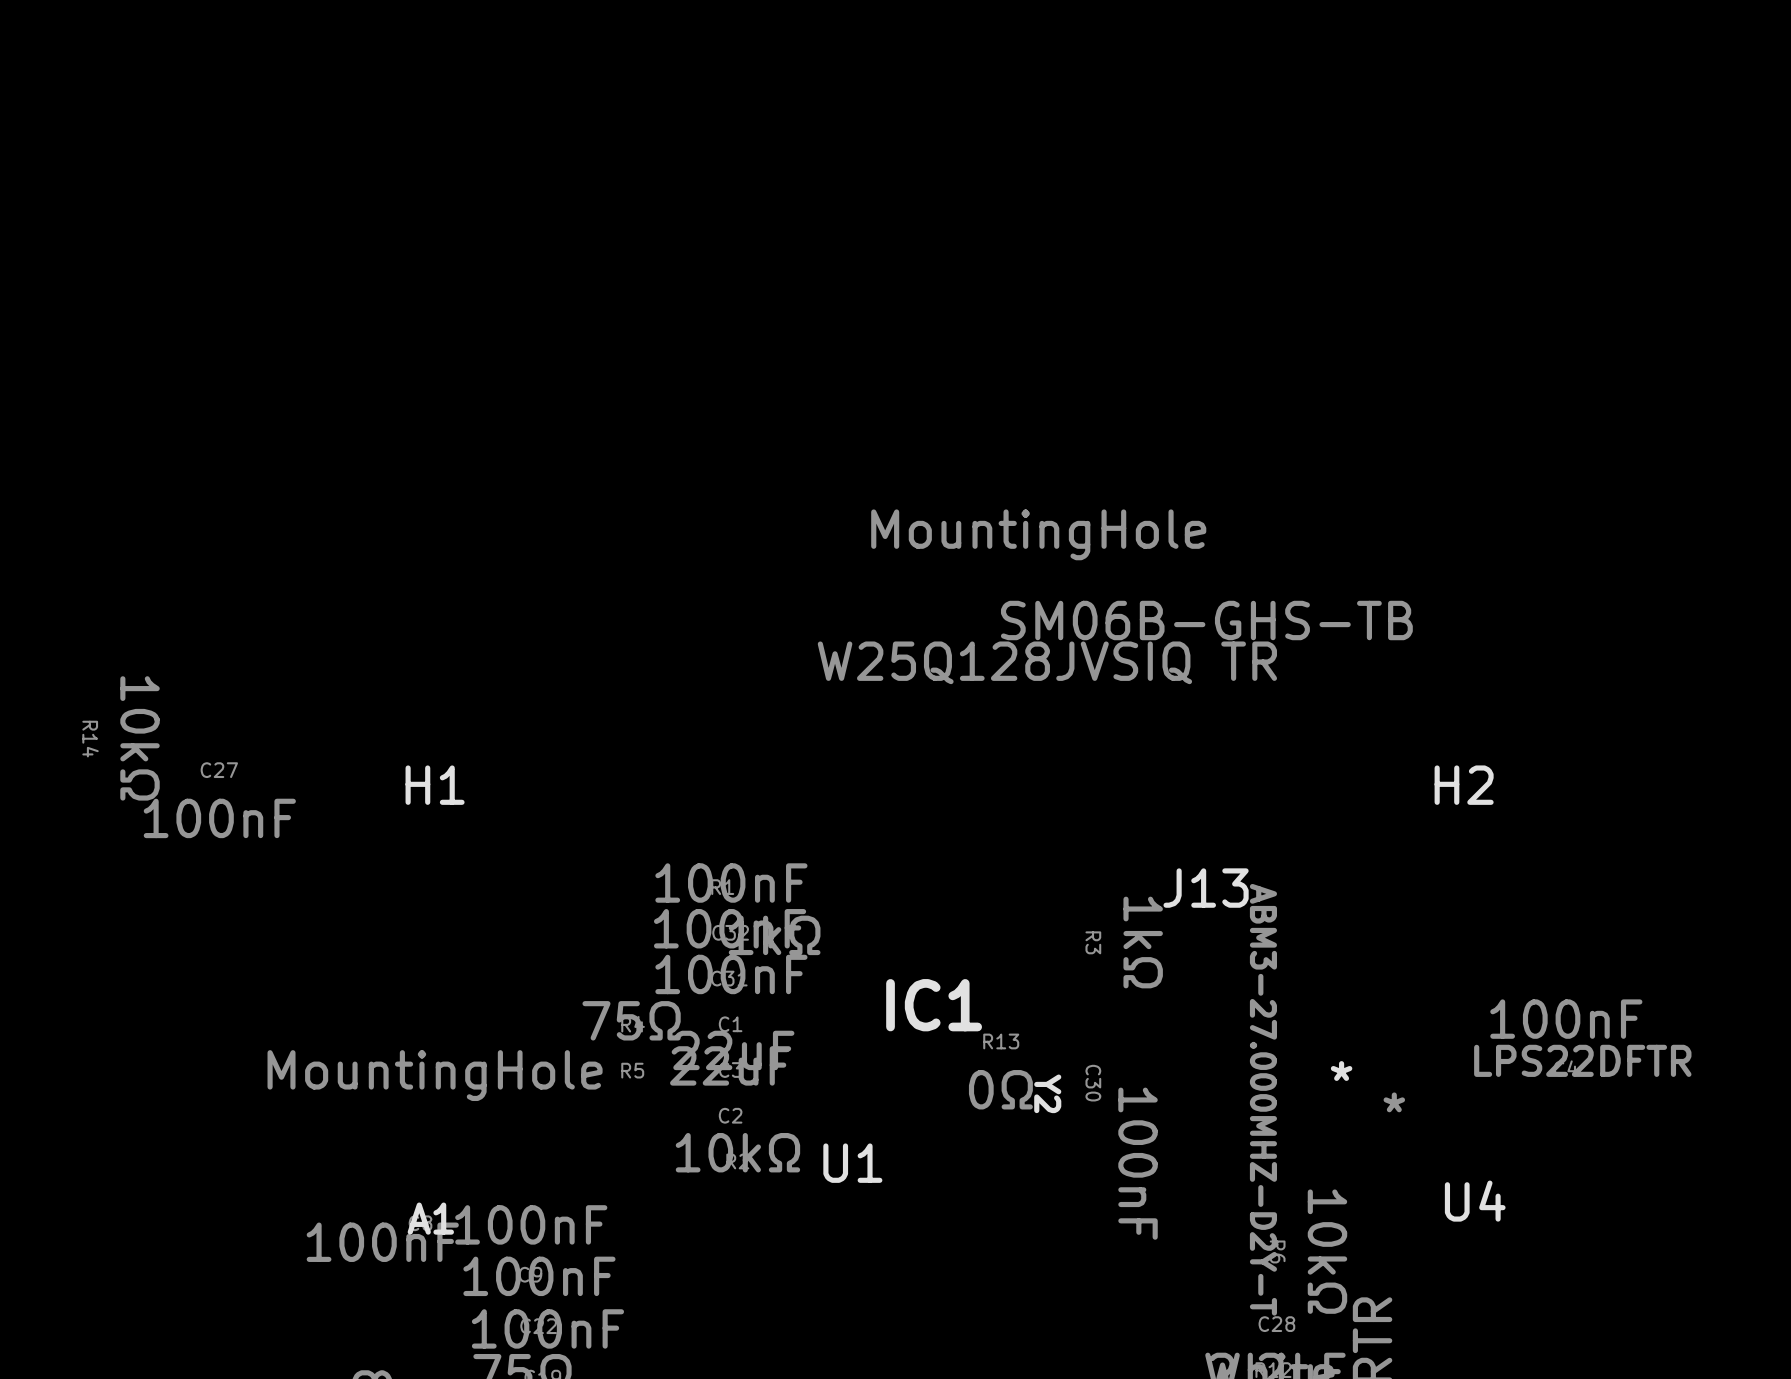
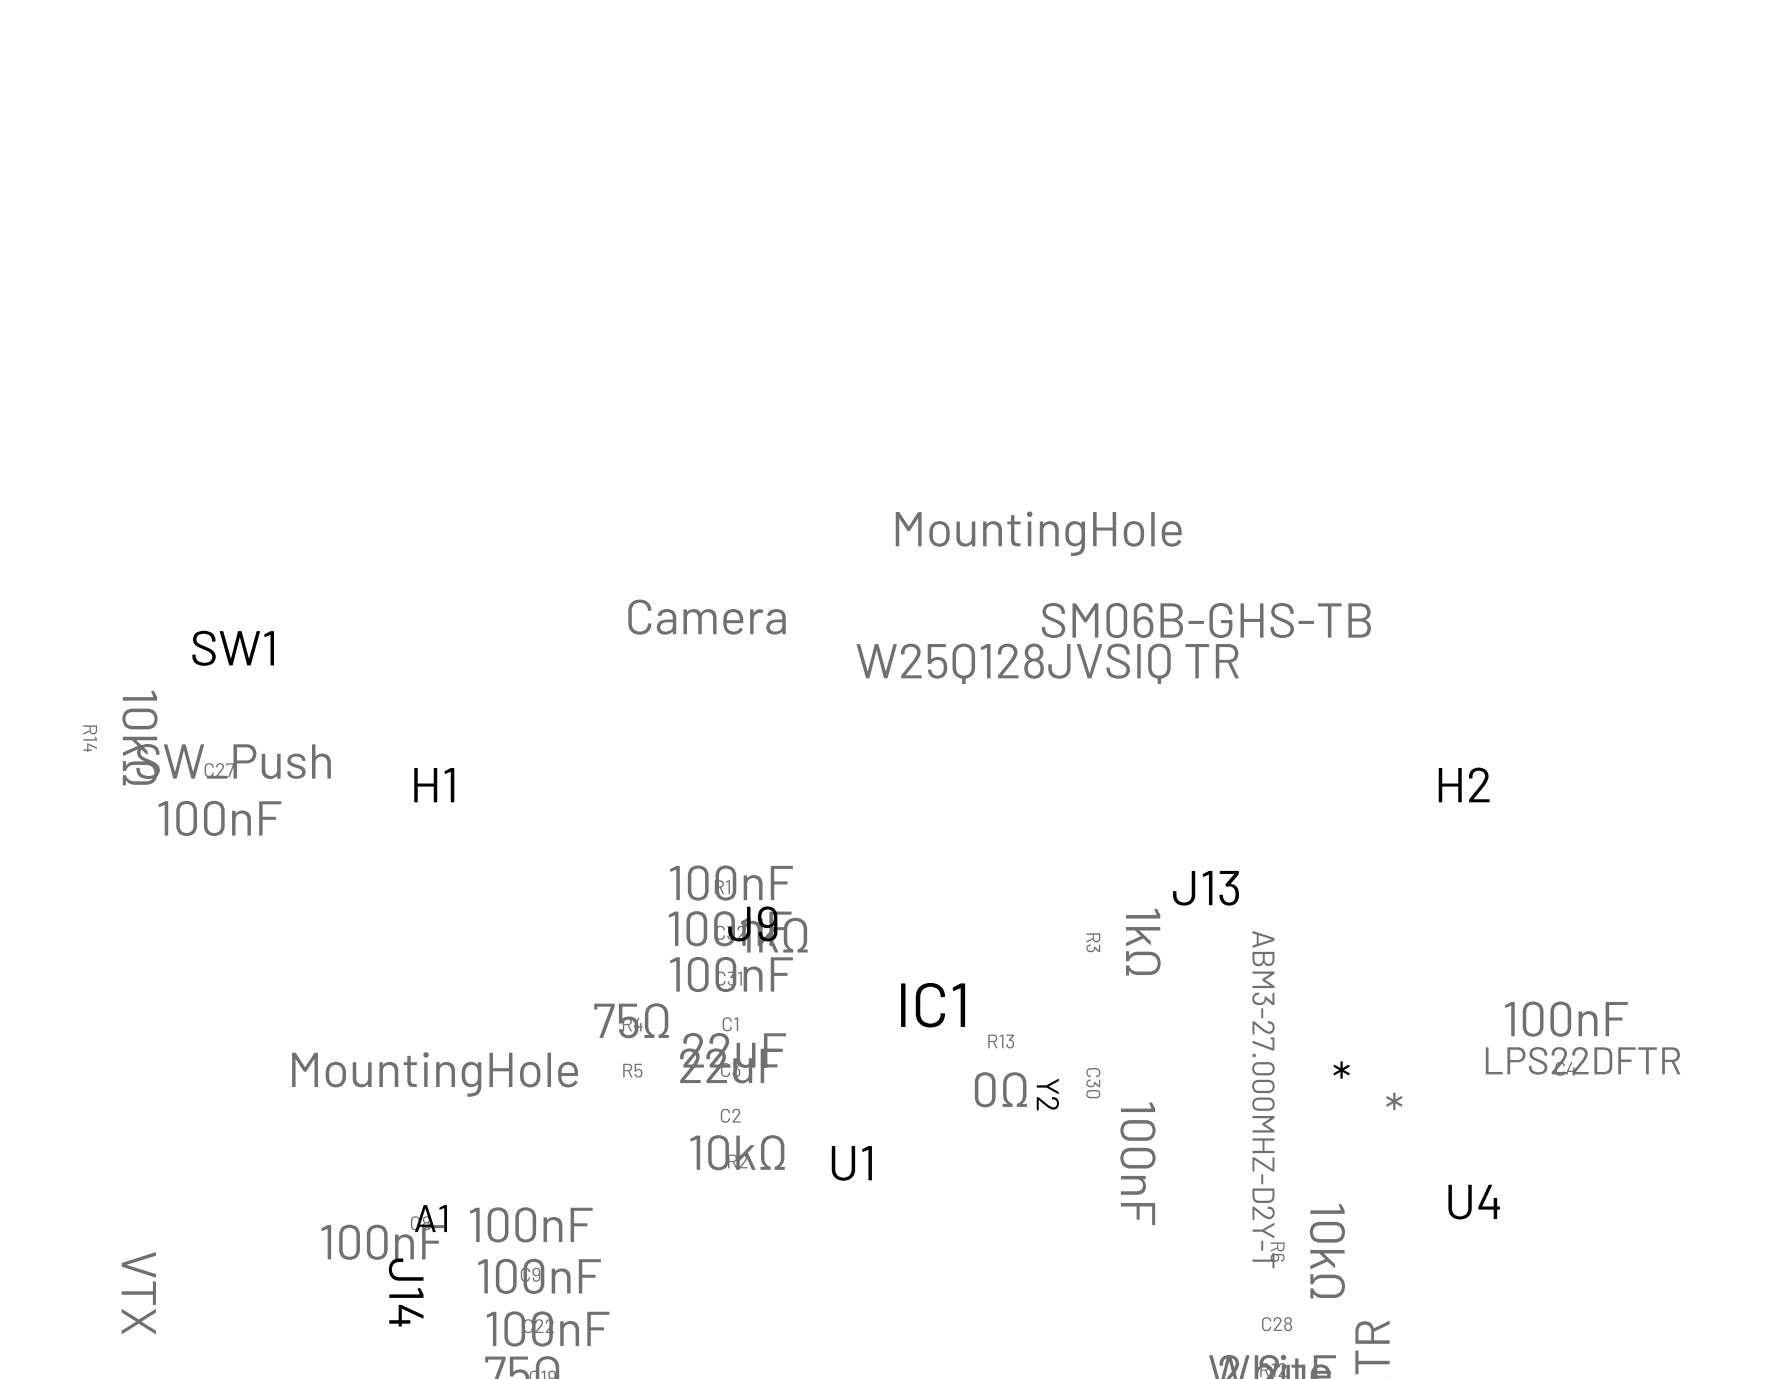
SW1: none -> SW_Push (233, 704)
J9: none -> Camera (707, 770)
J14: none -> VTX (272, 1293)

